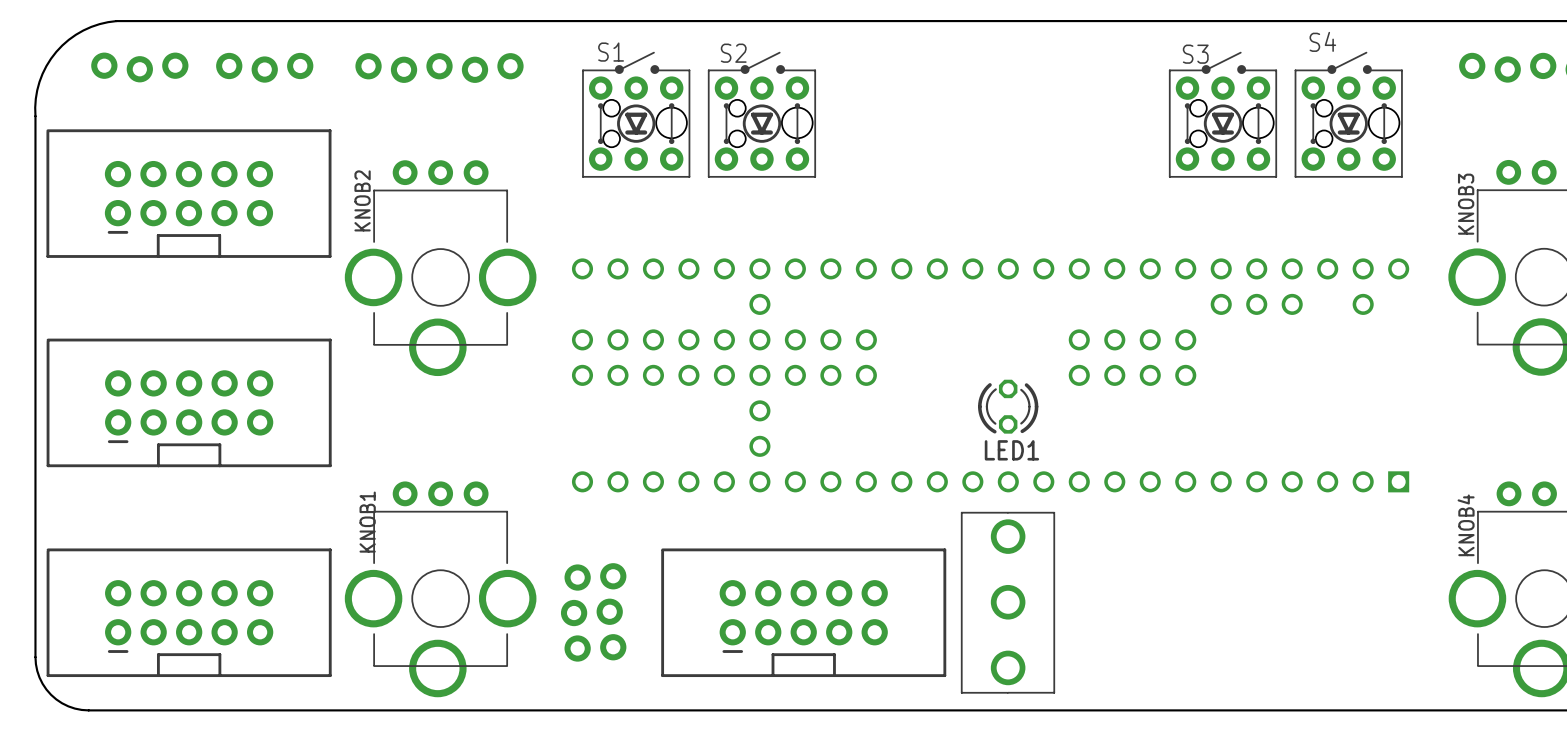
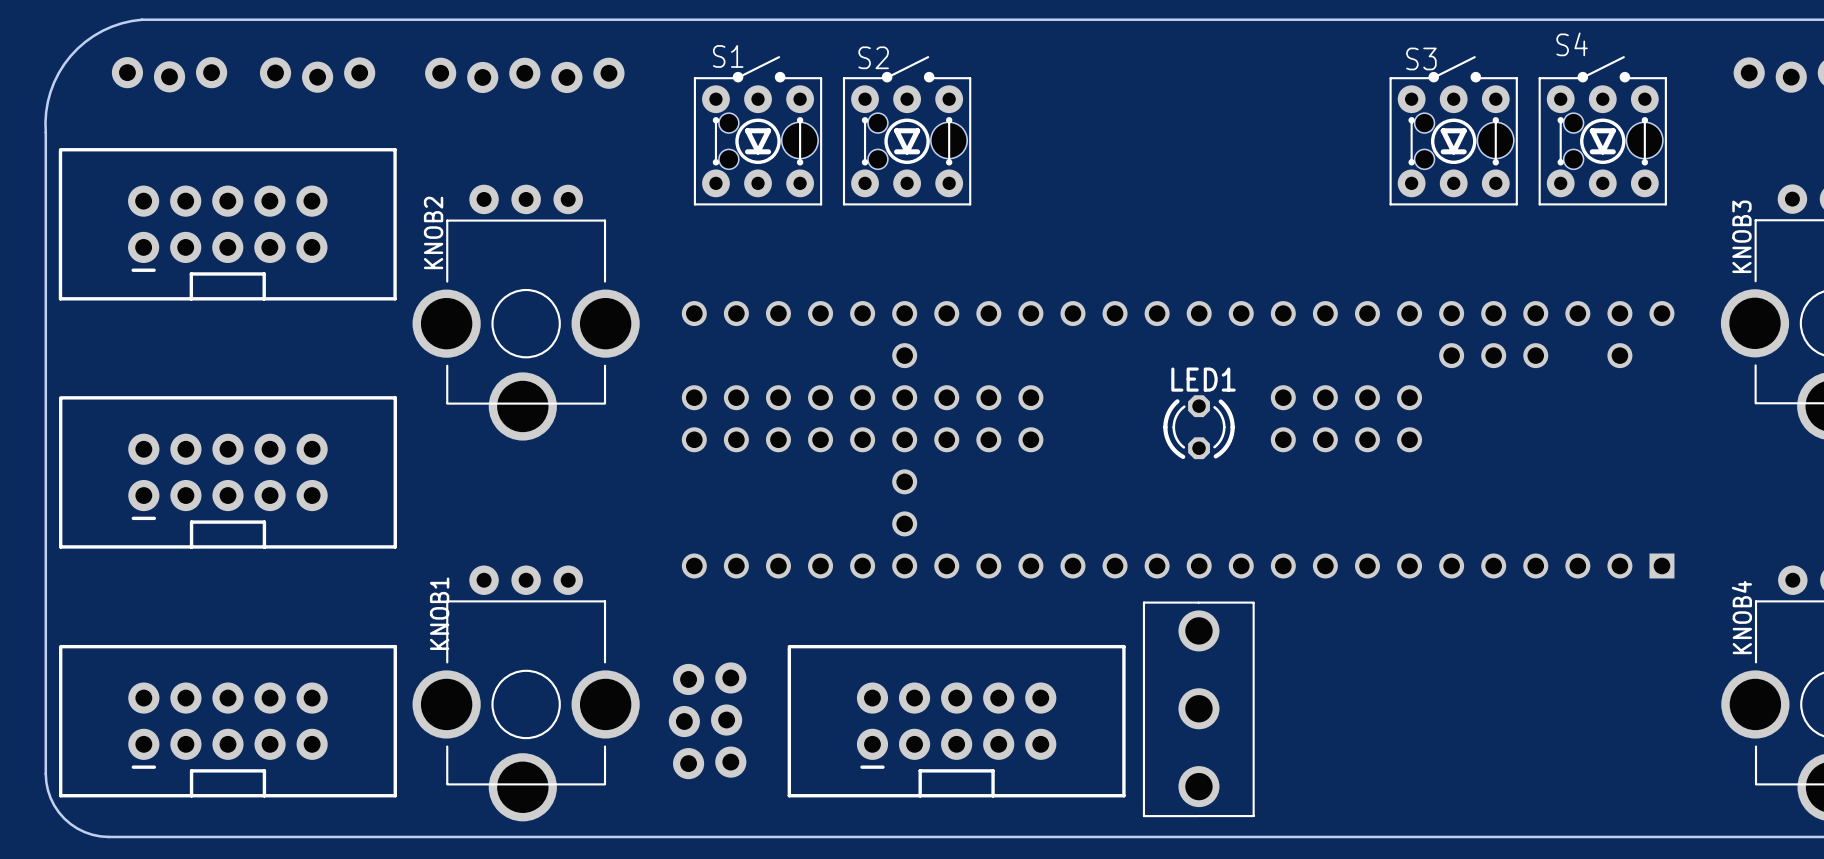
LED1 position: (1008, 406) -> (1199, 427)
LED1 name position: LED1 (1011, 450) -> LED1 (1203, 379)

